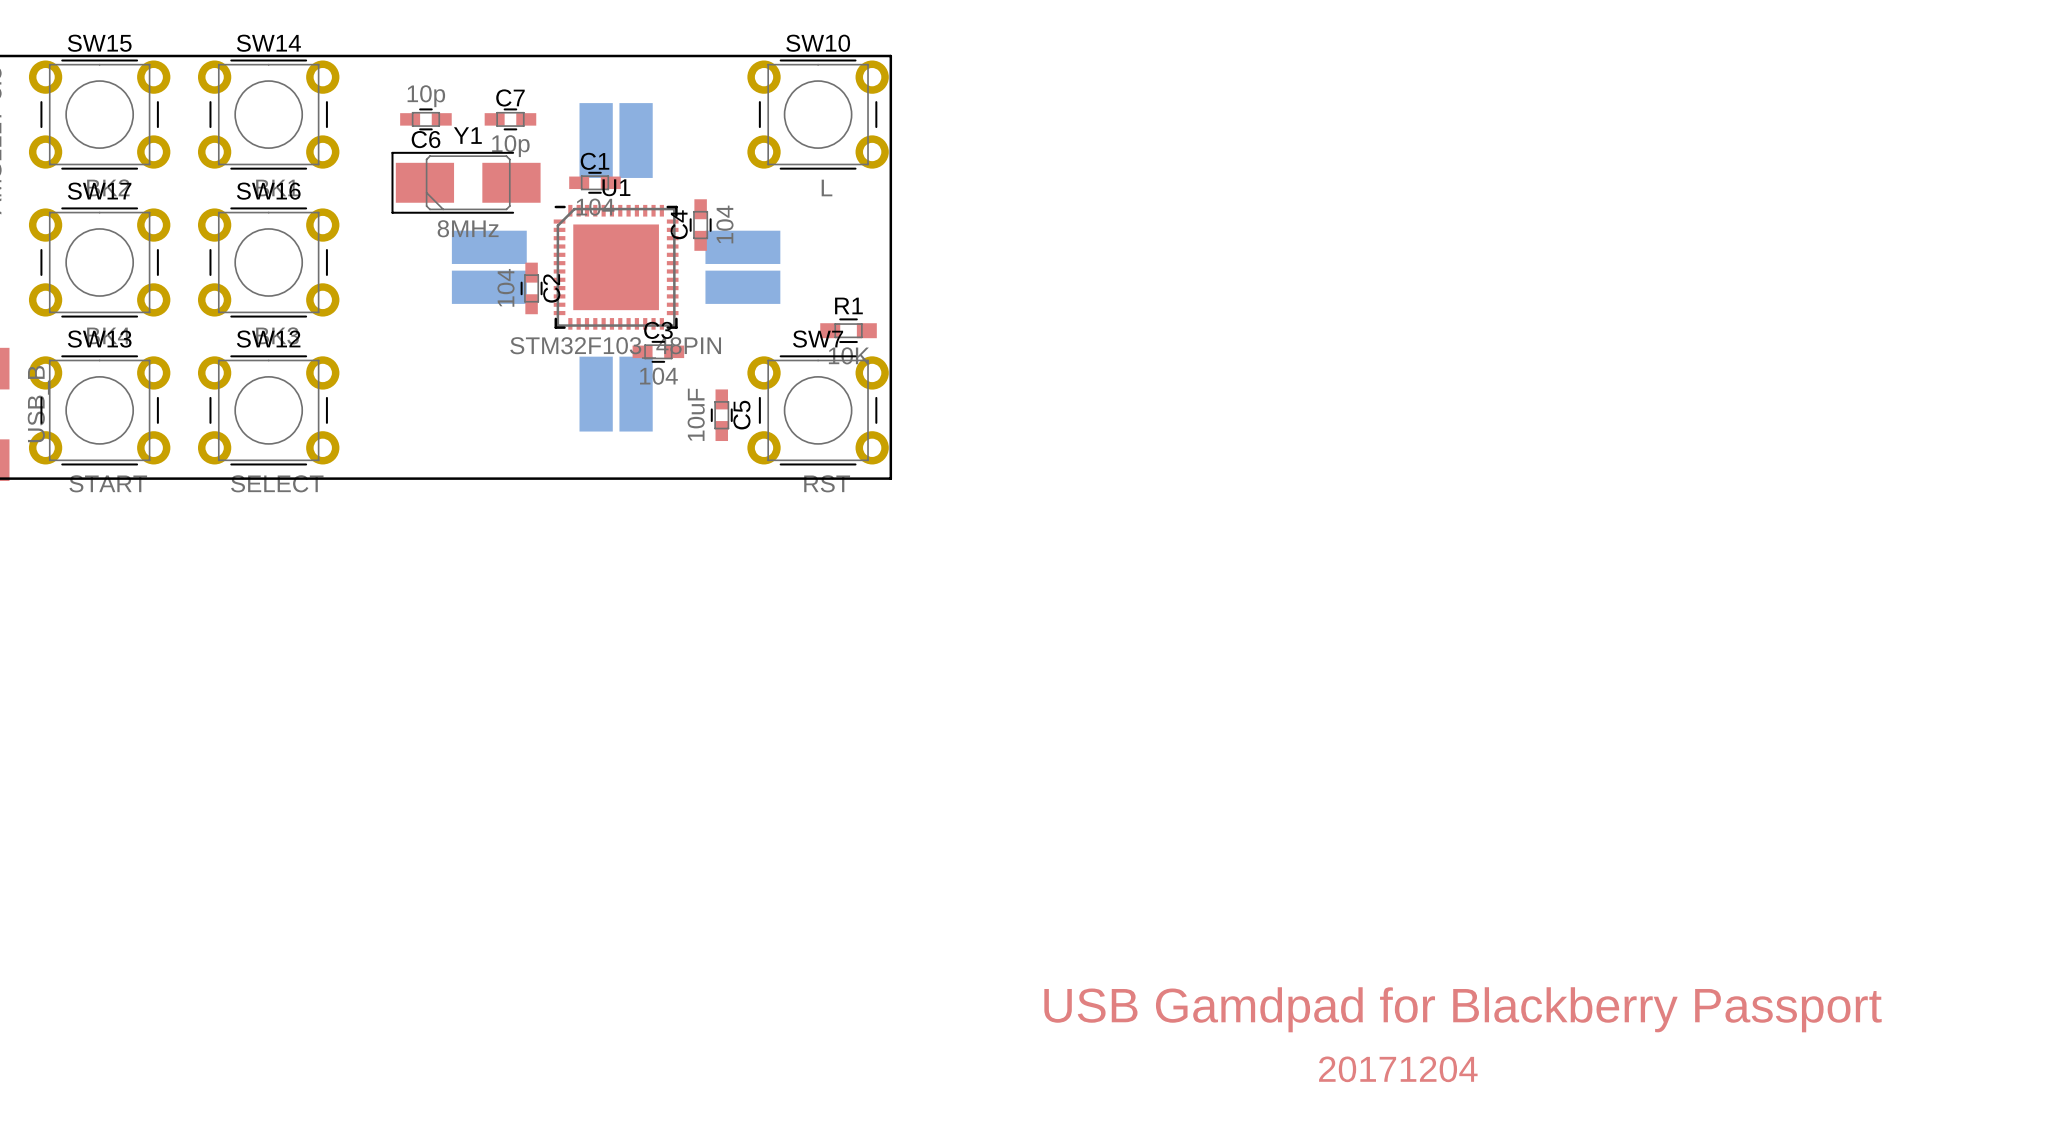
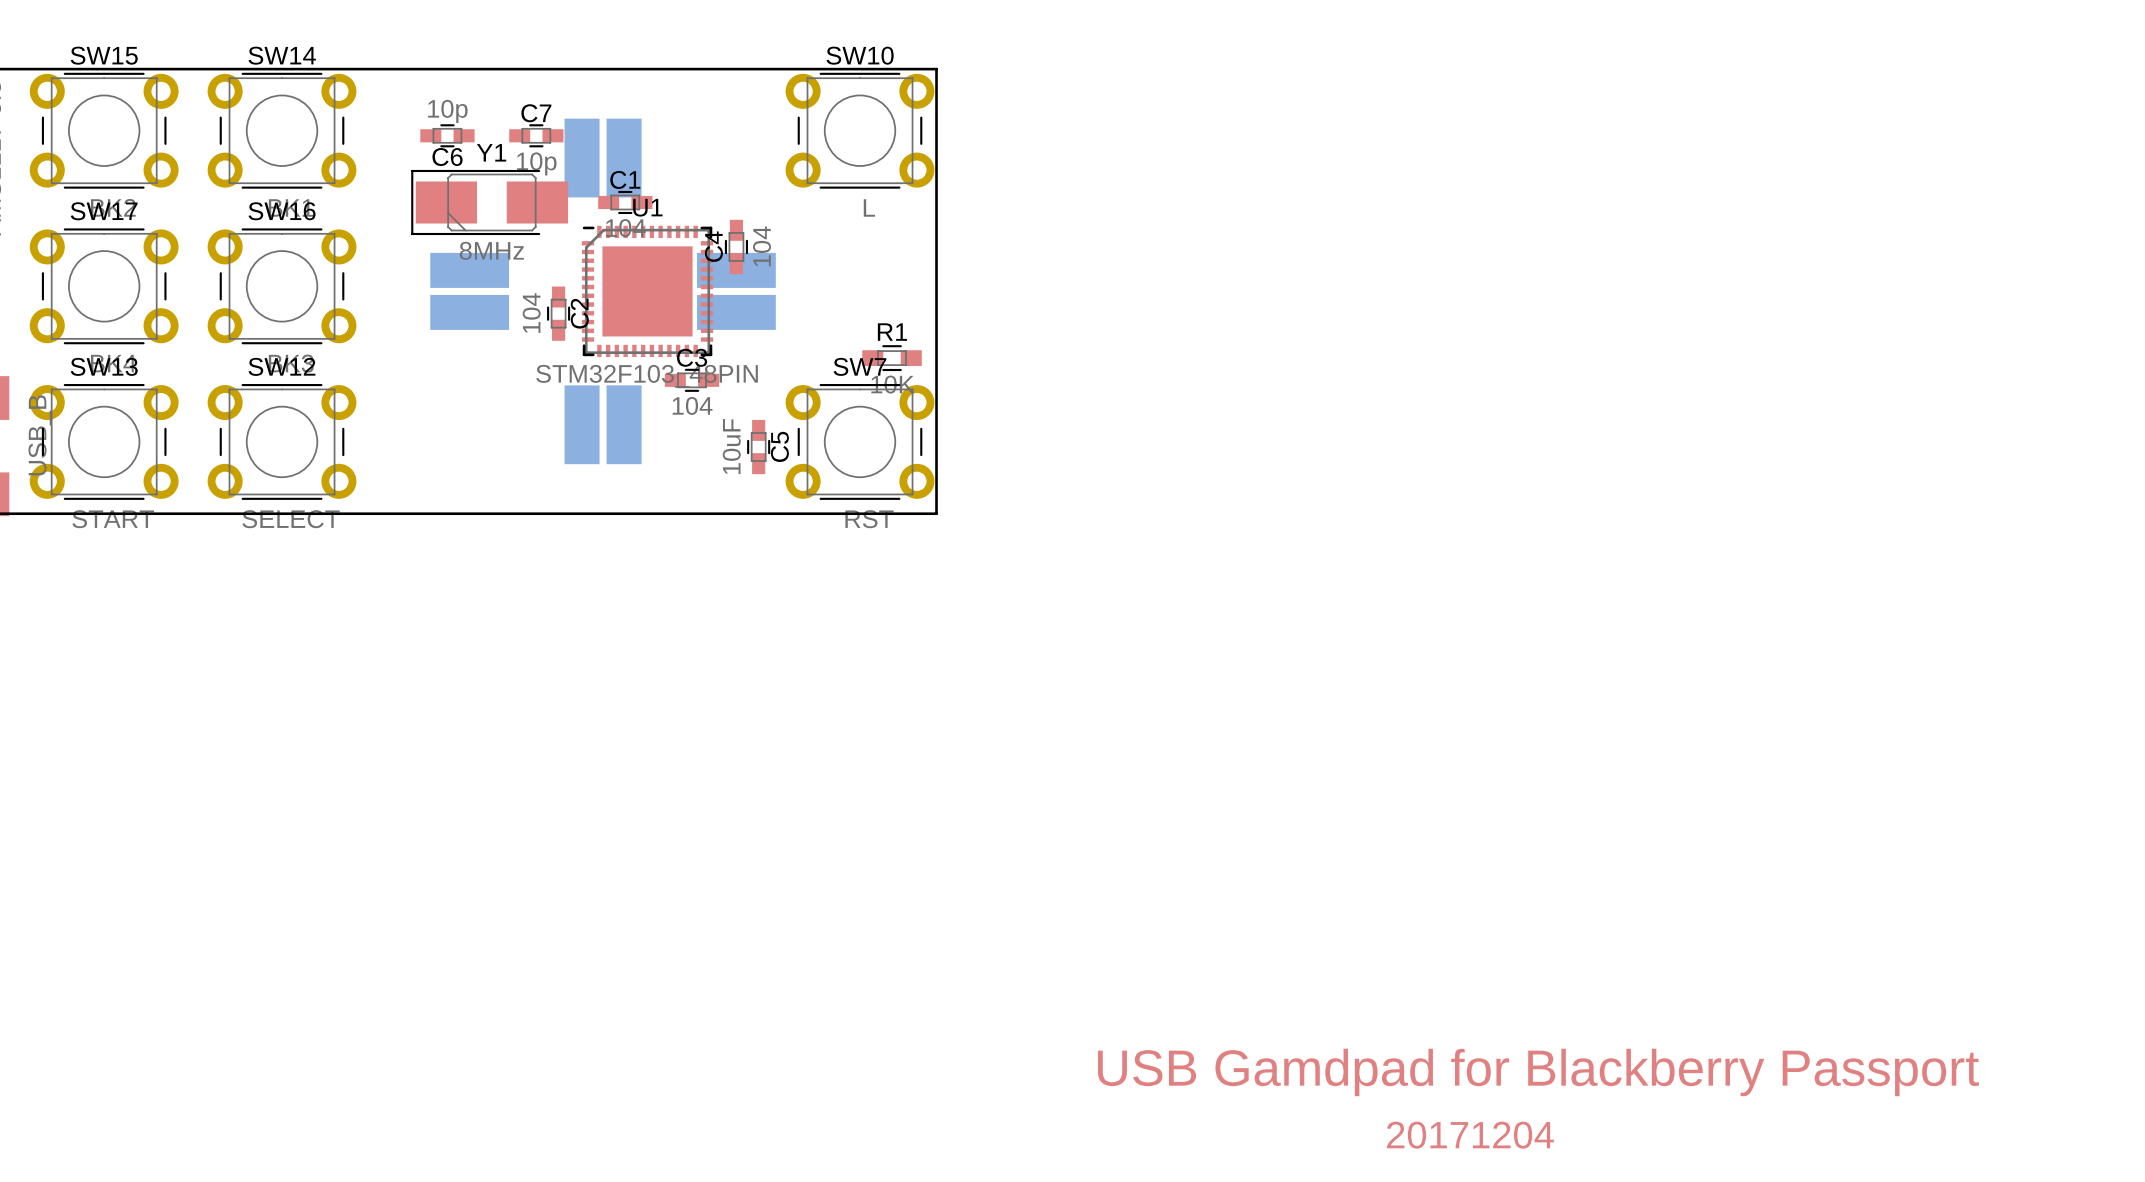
part position: (616, 140) -> (603, 158)
part position: (489, 267) -> (469, 291)
part position: (742, 267) -> (736, 291)
part position: (616, 394) -> (603, 424)

